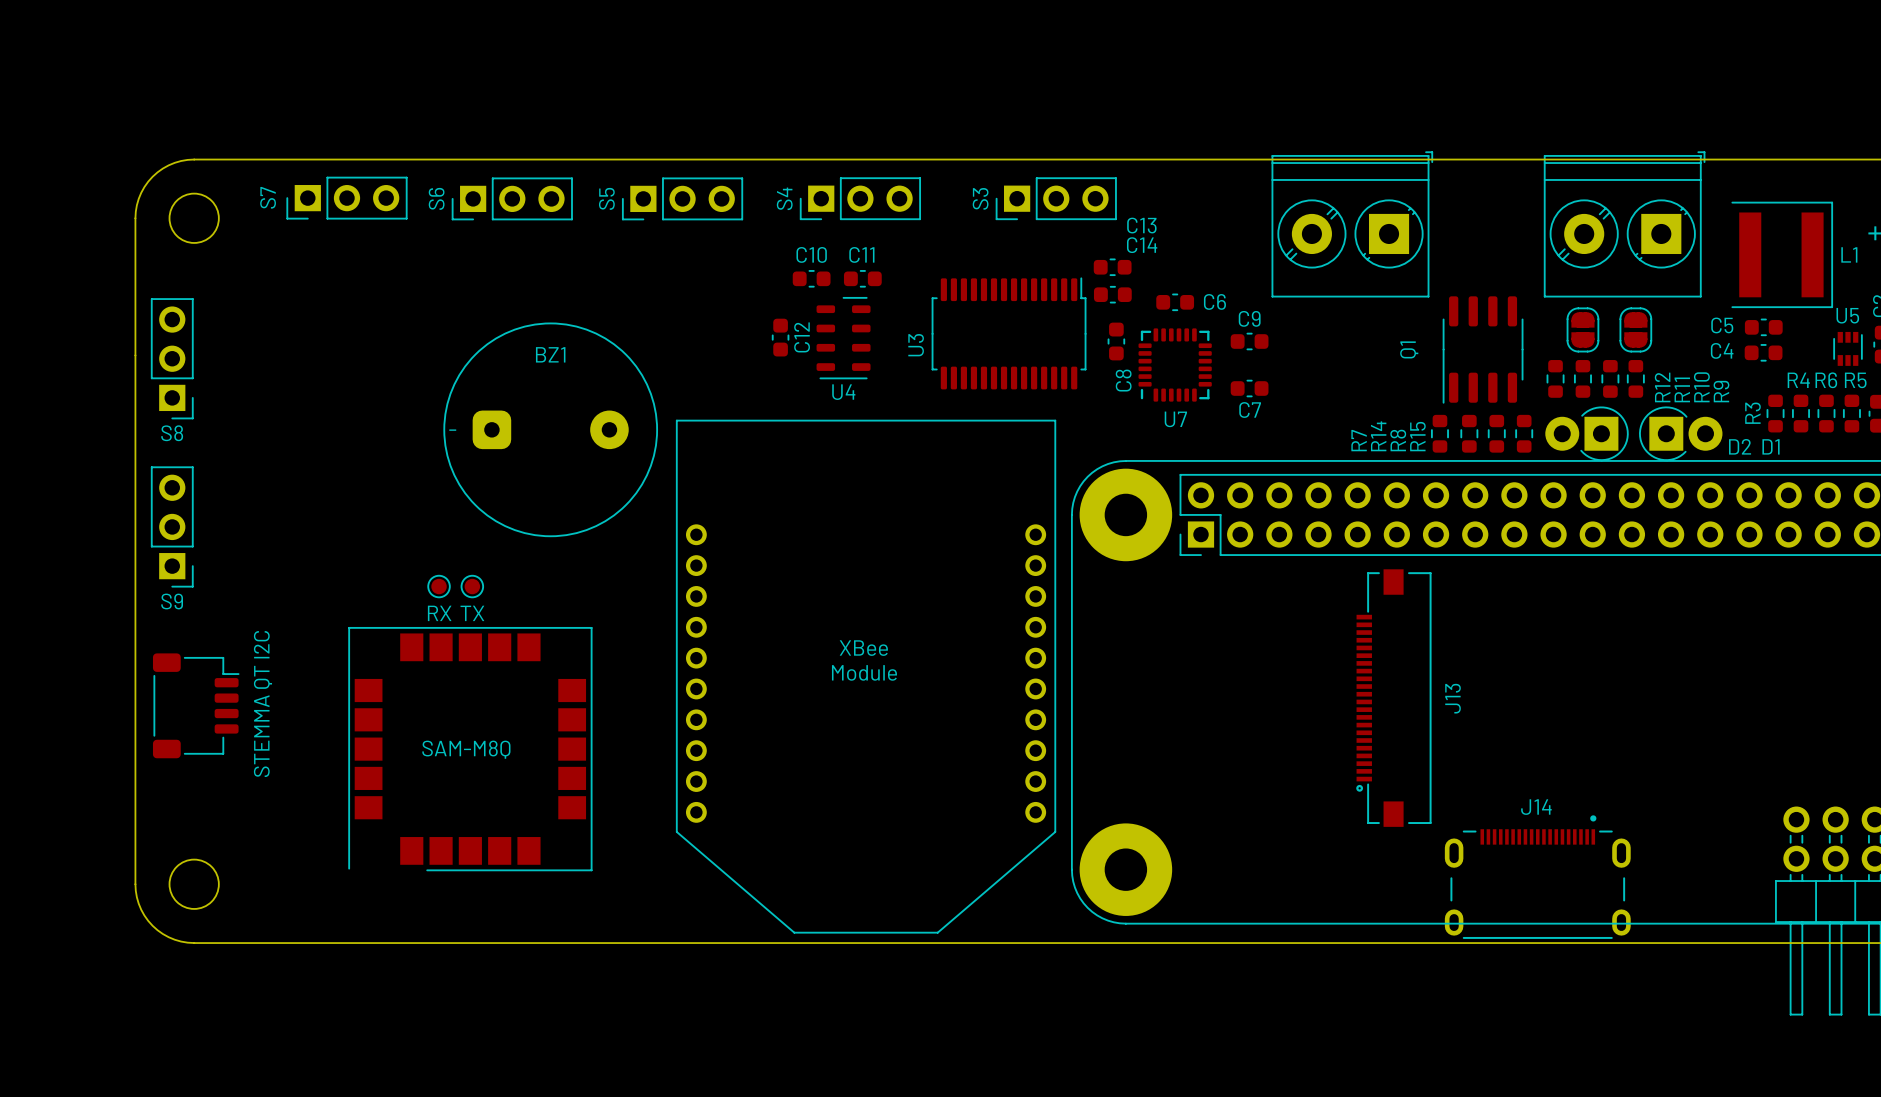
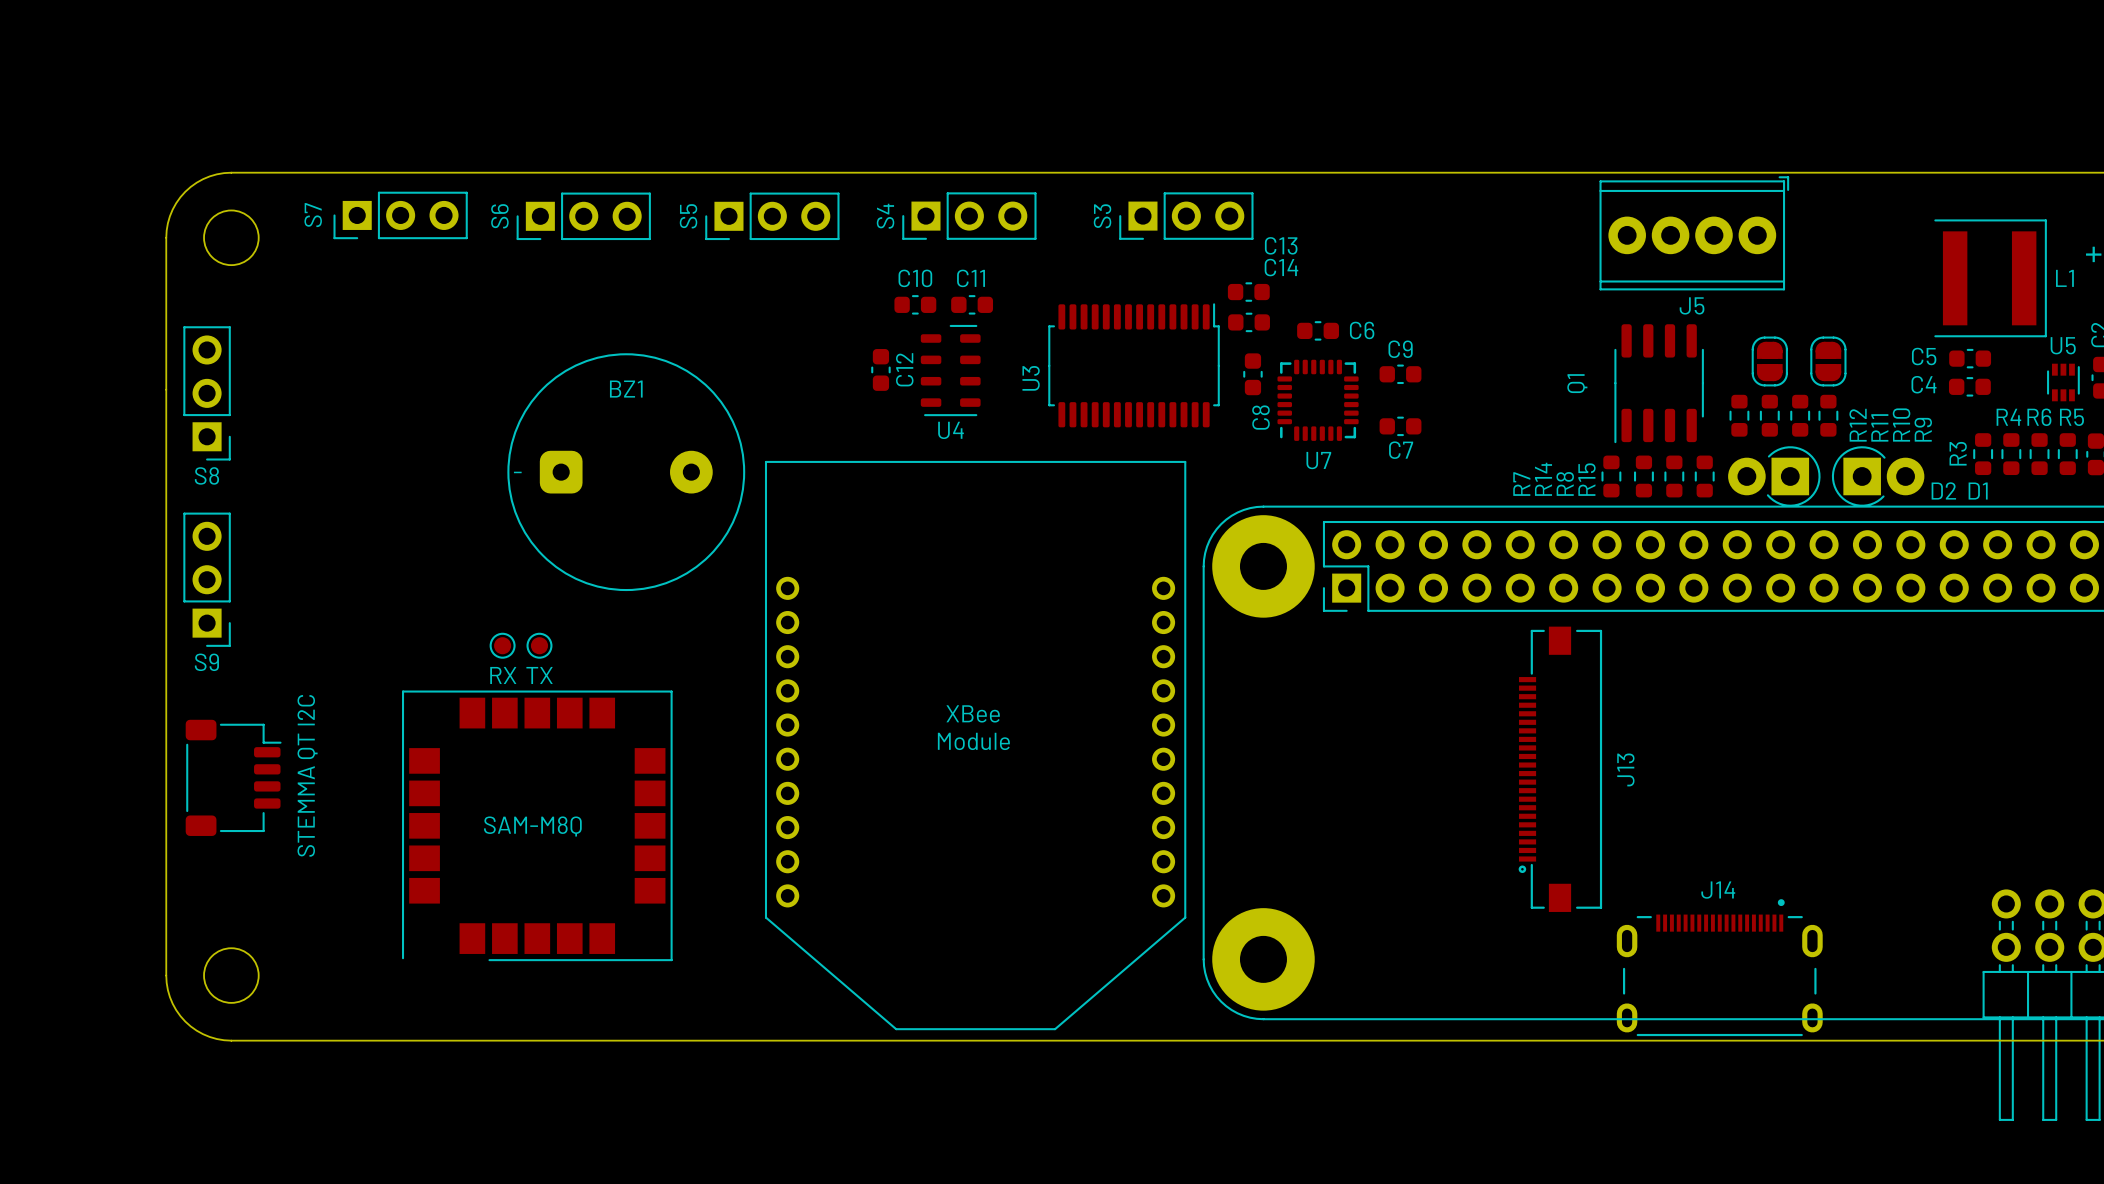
J5: none -> (1694, 233)
part: (1352, 224) -> none
part: (1624, 224) -> none

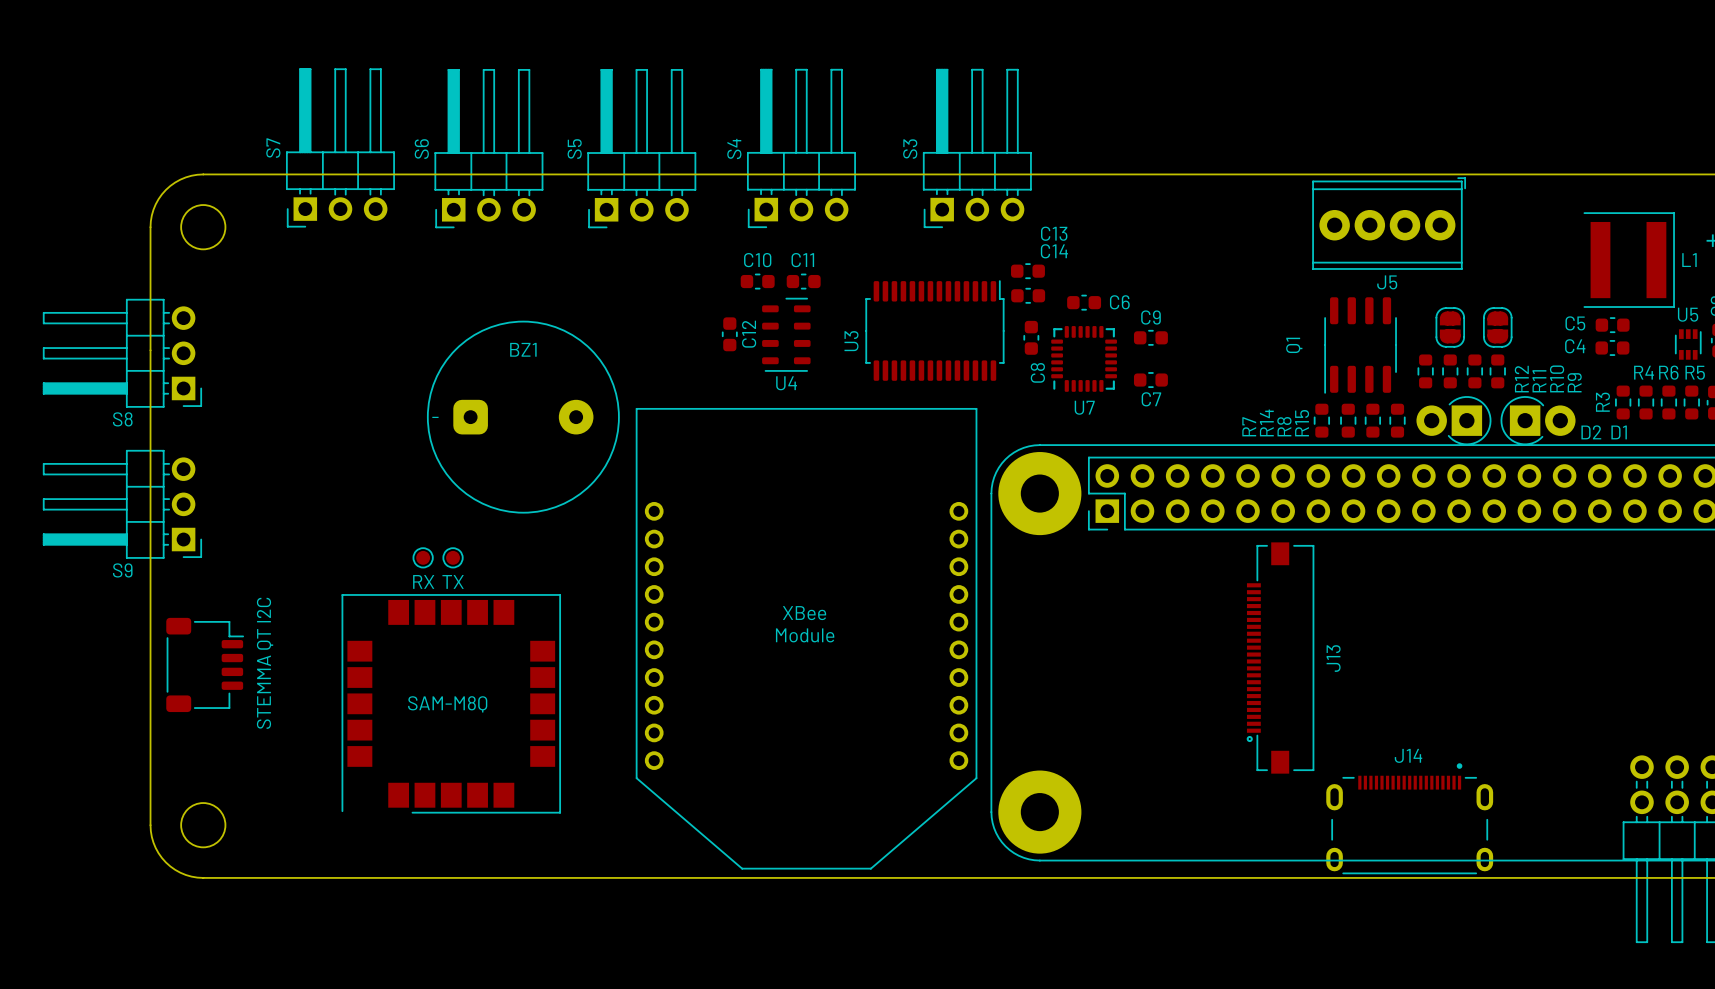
S7 footprint: [333, 191, 468, 240] -> [286, 68, 395, 228]
S6 footprint: [516, 192, 651, 241] -> [434, 69, 544, 229]
S5 footprint: [705, 192, 840, 241] -> [587, 69, 697, 229]
S4 footprint: [902, 192, 1037, 240] -> [747, 68, 856, 229]
S3 footprint: [1119, 192, 1254, 240] -> [922, 68, 1032, 229]
S8 footprint: [183, 326, 231, 461] -> [42, 298, 203, 408]
S9 footprint: [183, 512, 231, 647] -> [42, 449, 203, 559]

